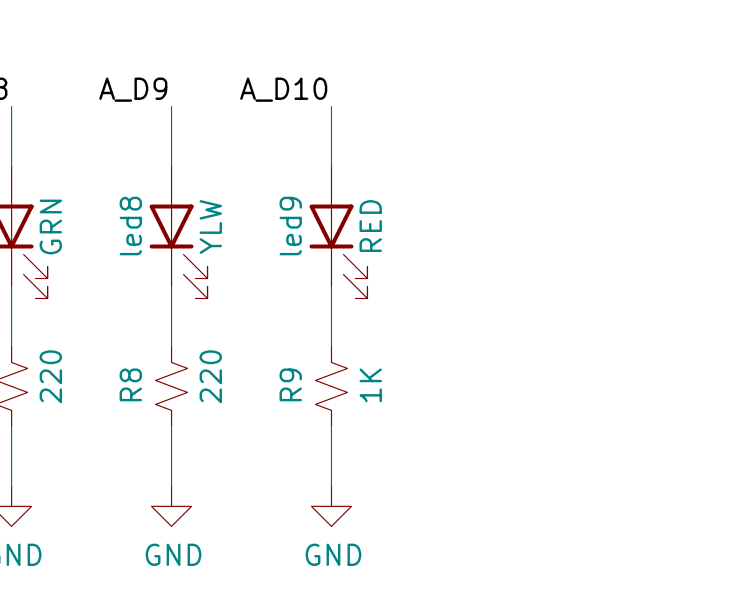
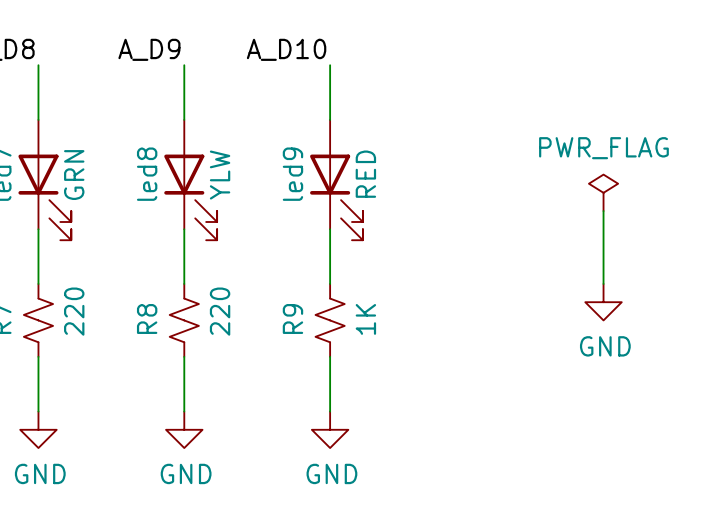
power symbol: none -> PWR_FLAG (603, 192)
wire: none -> (603, 211) (603, 283)
power symbol: none -> GND (603, 302)

